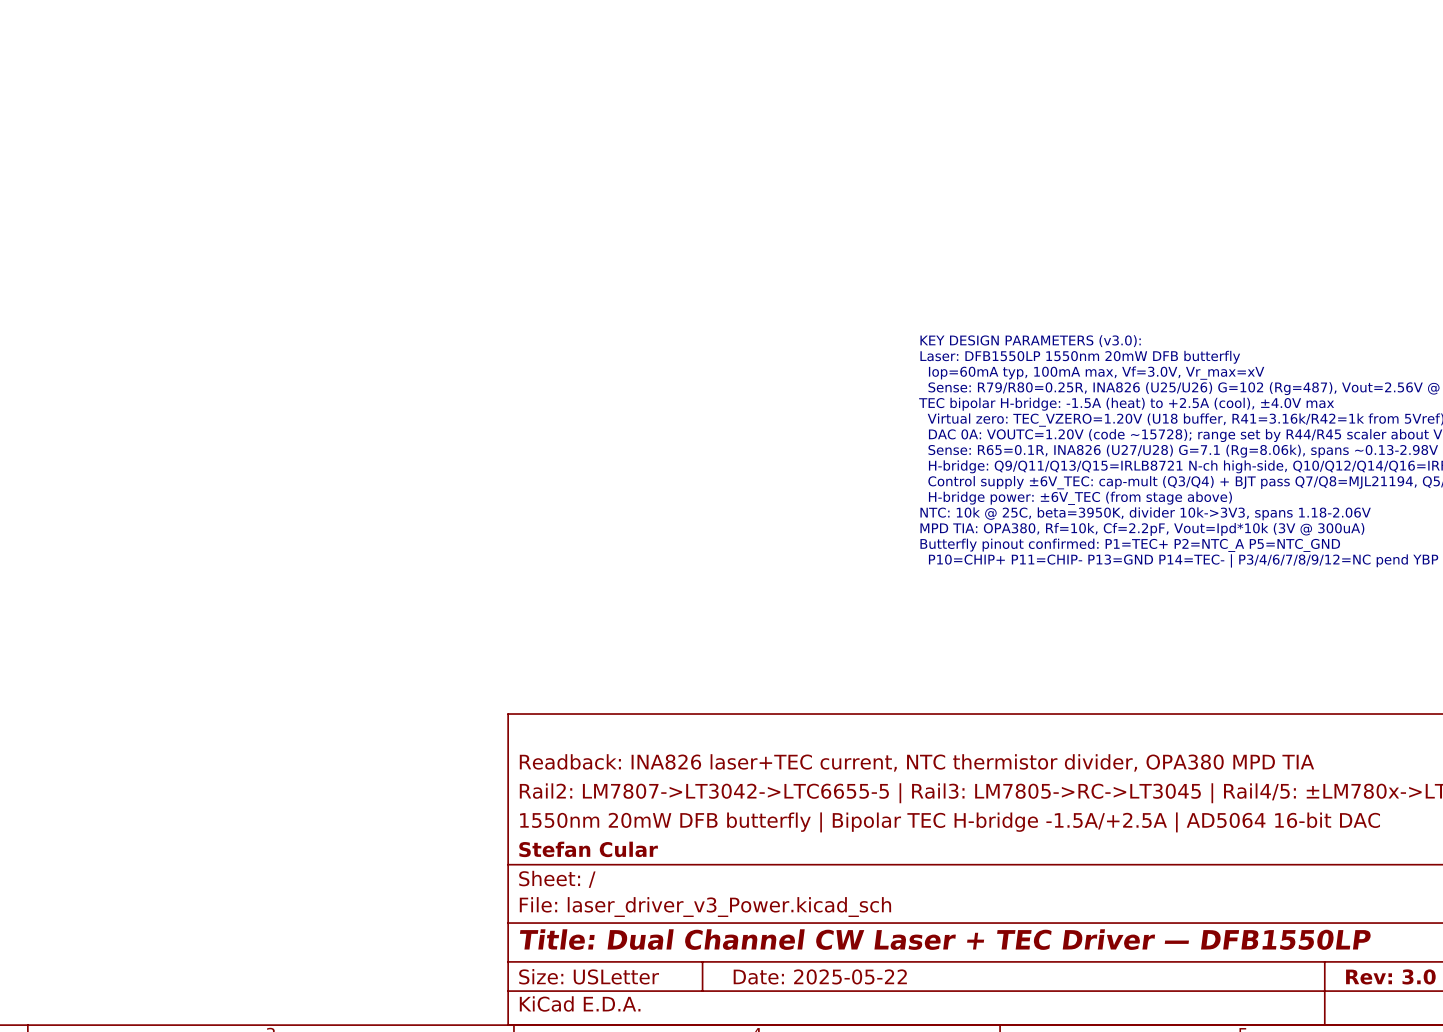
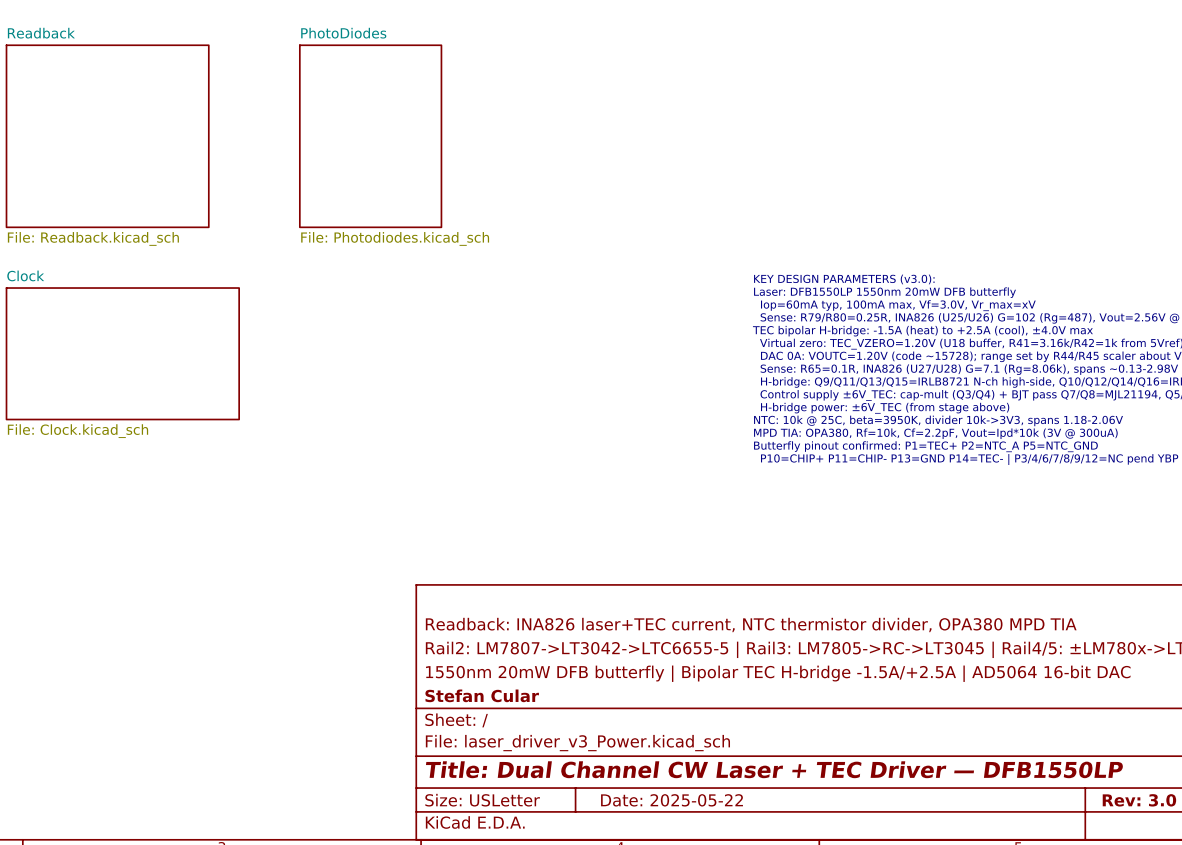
sheet Readback: none -> File: Readback.kicad_sch (107, 136)
sheet PhotoDiodes: none -> File: Photodiodes.kicad_sch (370, 136)
sheet Clock: none -> File: Clock.kicad_sch (122, 353)

